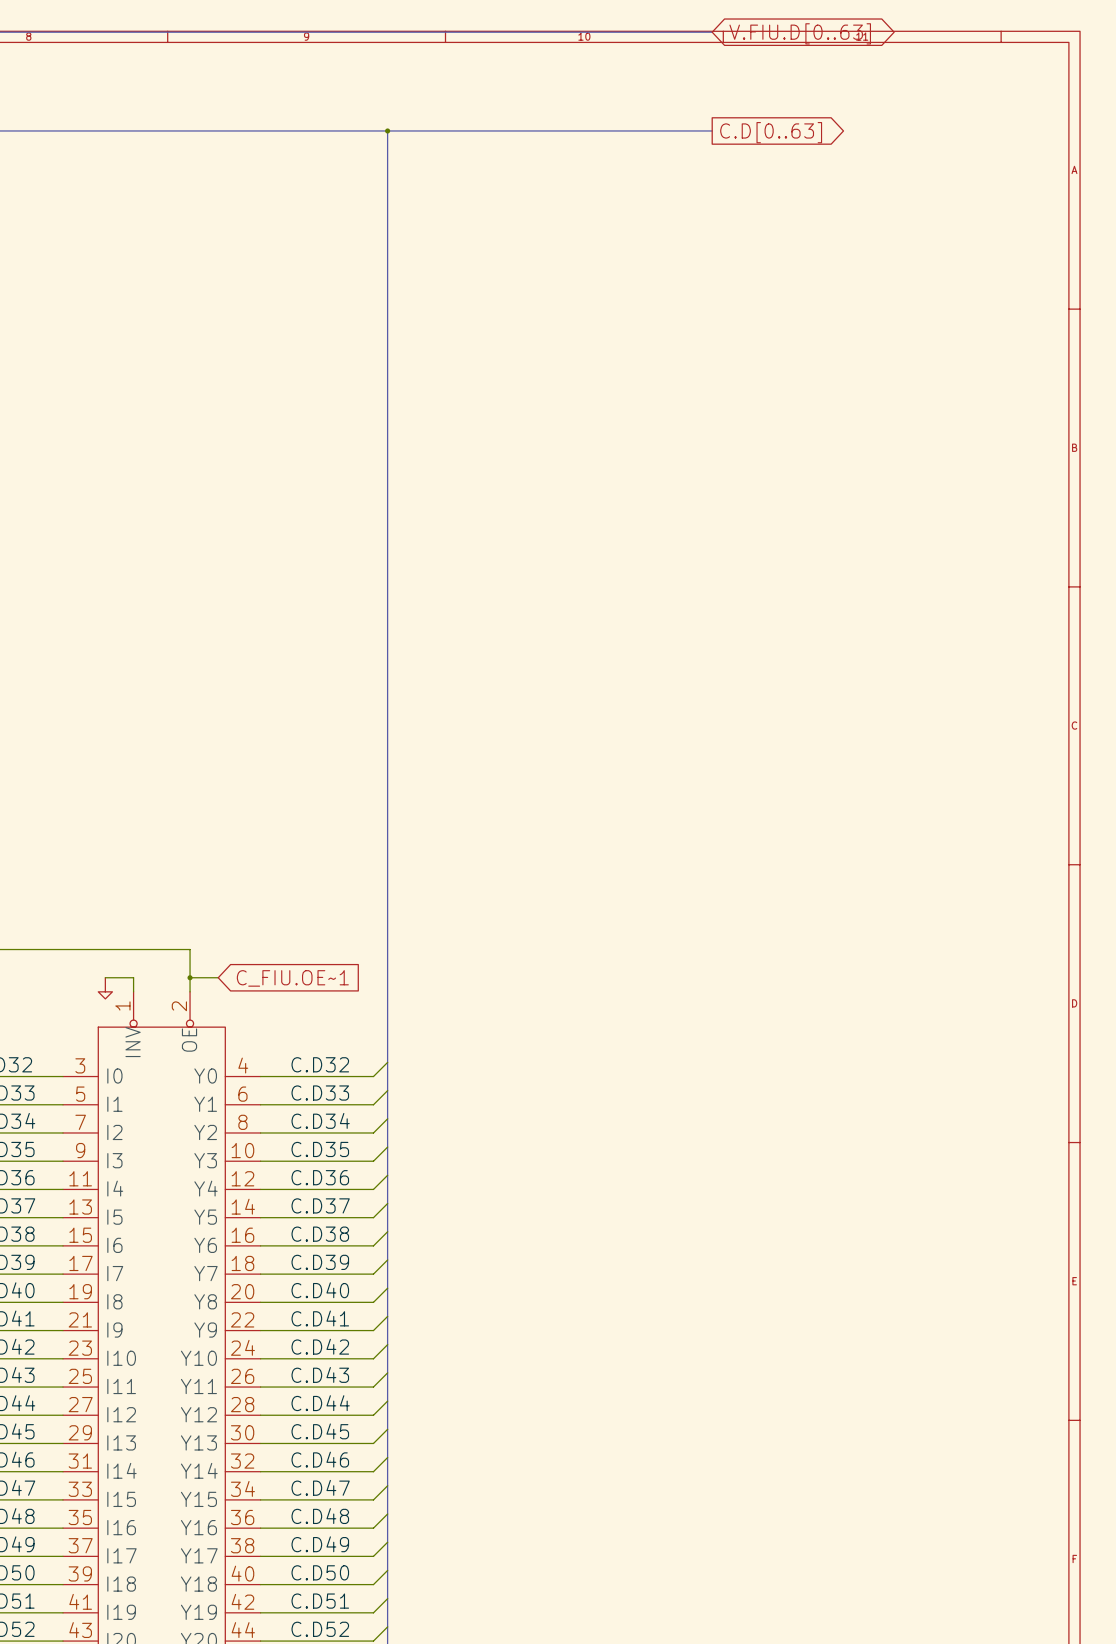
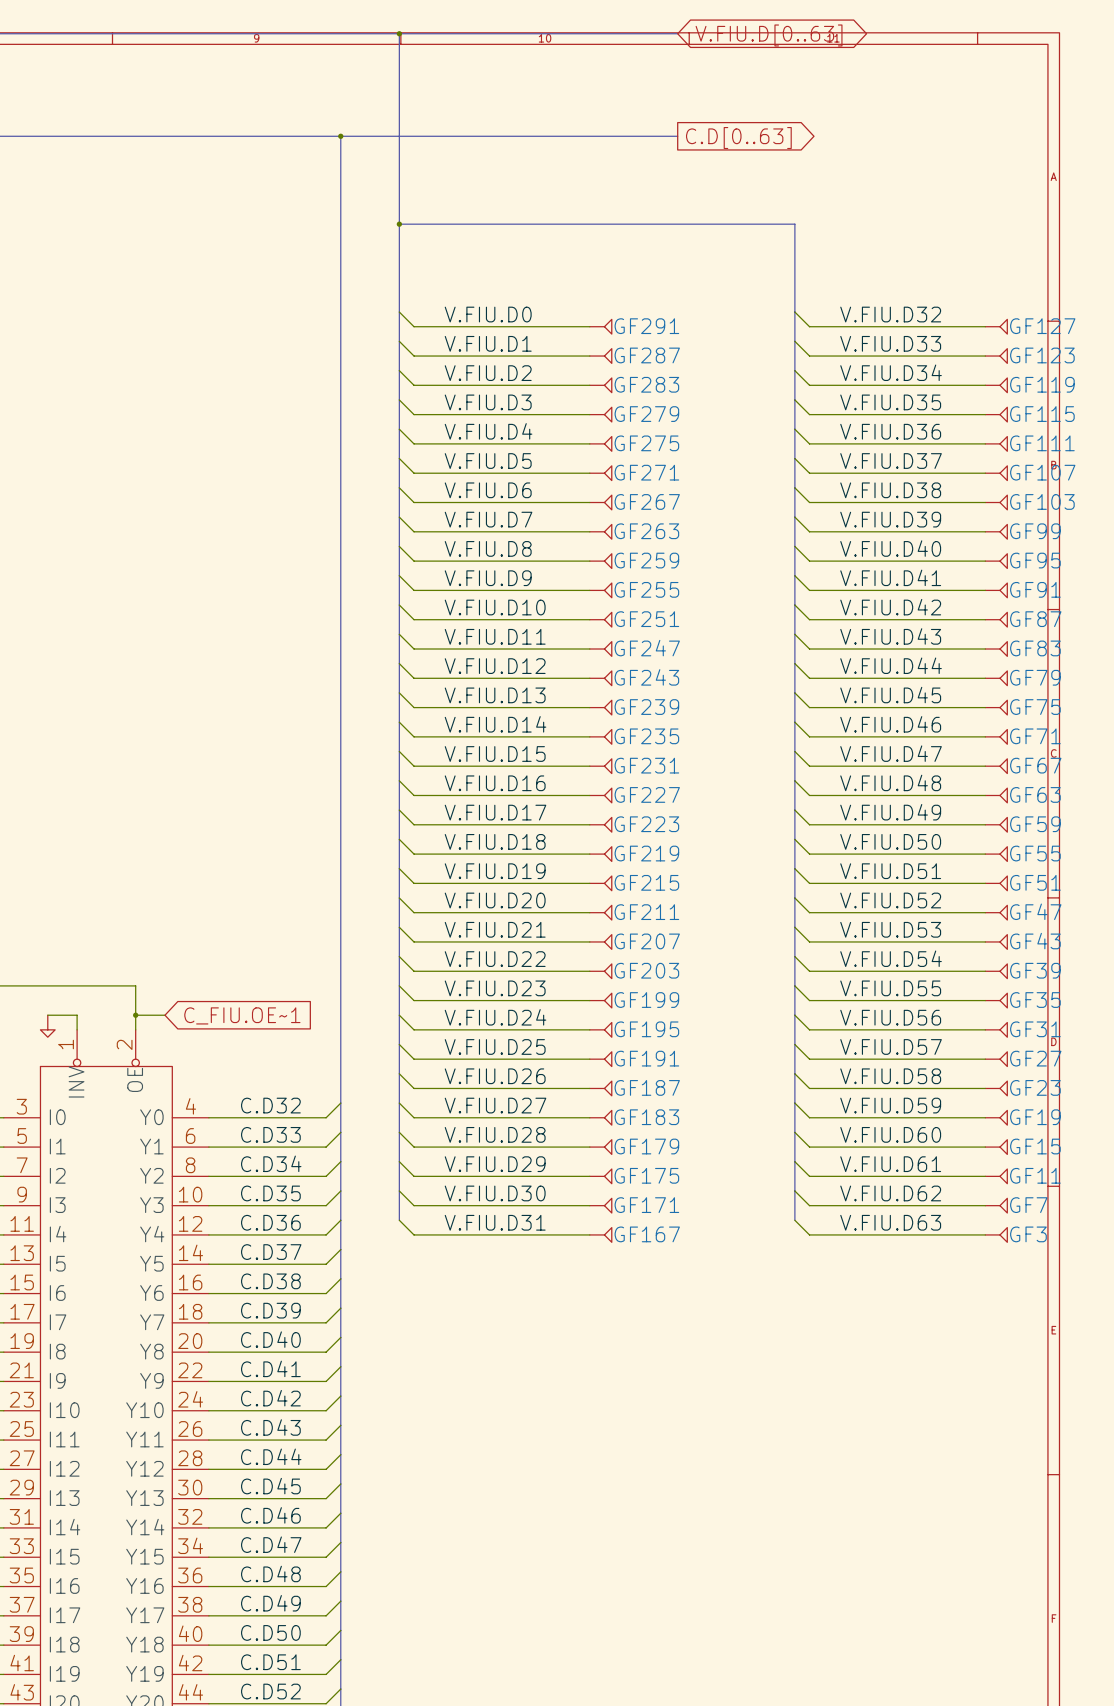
bus: none -> (399, 33) (399, 1220)
junction: none -> (399, 33)
bus: none -> (399, 224) (794, 224) (794, 1220)
junction: none -> (399, 224)
wire: none -> (399, 312) (414, 326) (589, 326)
wire: none -> (794, 312) (809, 326) (985, 326)
label: none -> V.FIU.D0 (488, 314)
label: none -> V.FIU.D32 (890, 314)
GF291: none -> (601, 326)
GF127: none -> (996, 326)
wire: none -> (399, 341) (414, 356) (589, 356)
wire: none -> (794, 341) (809, 356) (985, 356)
label: none -> V.FIU.D1 (488, 343)
label: none -> V.FIU.D33 (890, 343)
GF287: none -> (601, 356)
GF123: none -> (996, 356)
wire: none -> (399, 370) (414, 385) (589, 385)
wire: none -> (794, 370) (809, 385) (985, 385)
label: none -> V.FIU.D34 (891, 372)
label: none -> V.FIU.D2 (488, 373)
GF283: none -> (601, 385)
GF119: none -> (996, 385)
wire: none -> (399, 399) (414, 414) (589, 414)
wire: none -> (794, 399) (809, 414) (985, 414)
label: none -> V.FIU.D3 (488, 402)
label: none -> V.FIU.D35 (890, 402)
GF279: none -> (601, 414)
GF115: none -> (996, 414)
wire: none -> (399, 429) (414, 443) (589, 443)
wire: none -> (794, 429) (809, 443) (985, 443)
label: none -> V.FIU.D4 (488, 431)
label: none -> V.FIU.D36 (890, 431)
GF275: none -> (601, 443)
GF111: none -> (996, 443)
wire: none -> (399, 458) (414, 473) (589, 473)
wire: none -> (794, 458) (809, 473) (985, 473)
label: none -> V.FIU.D5 (488, 461)
label: none -> V.FIU.D37 (891, 461)
GF271: none -> (601, 473)
GF107: none -> (996, 473)
wire: none -> (399, 487) (414, 502) (589, 502)
wire: none -> (794, 487) (809, 502) (985, 502)
label: none -> V.FIU.D6 (488, 490)
label: none -> V.FIU.D38 (890, 490)
GF267: none -> (601, 502)
GF103: none -> (996, 502)
wire: none -> (399, 517) (414, 531) (589, 531)
wire: none -> (794, 517) (809, 531) (985, 531)
label: none -> V.FIU.D7 (488, 519)
label: none -> V.FIU.D39 (890, 519)
GF263: none -> (601, 531)
GF99: none -> (996, 531)
wire: none -> (399, 546) (414, 561) (589, 561)
wire: none -> (794, 546) (809, 561) (985, 561)
label: none -> V.FIU.D8 (488, 548)
label: none -> V.FIU.D40 (890, 548)
GF259: none -> (601, 561)
GF95: none -> (996, 561)
wire: none -> (399, 575) (414, 590) (589, 590)
wire: none -> (794, 575) (809, 590) (985, 590)
label: none -> V.FIU.D9 (488, 578)
label: none -> V.FIU.D41 (890, 577)
GF255: none -> (601, 590)
GF91: none -> (996, 590)
wire: none -> (399, 605) (414, 619) (589, 619)
wire: none -> (794, 605) (809, 619) (985, 619)
label: none -> V.FIU.D10 (495, 607)
label: none -> V.FIU.D42 (890, 607)
GF251: none -> (601, 619)
GF87: none -> (996, 619)
wire: none -> (399, 634) (414, 649) (589, 649)
wire: none -> (794, 634) (809, 649) (985, 649)
label: none -> V.FIU.D43 (890, 636)
label: none -> V.FIU.D11 (495, 636)
GF247: none -> (601, 649)
GF83: none -> (996, 649)
wire: none -> (399, 663) (414, 678) (589, 678)
wire: none -> (794, 663) (809, 678) (985, 678)
label: none -> V.FIU.D12 (495, 666)
label: none -> V.FIU.D44 (891, 665)
GF243: none -> (601, 678)
GF79: none -> (996, 678)
wire: none -> (399, 692) (414, 707) (589, 707)
wire: none -> (794, 692) (809, 707) (985, 707)
label: none -> V.FIU.D13 (495, 695)
label: none -> V.FIU.D45 (890, 695)
GF239: none -> (601, 707)
GF75: none -> (996, 707)
wire: none -> (399, 722) (414, 736) (589, 736)
wire: none -> (794, 722) (809, 736) (985, 736)
label: none -> V.FIU.D14 (495, 724)
label: none -> V.FIU.D46 (890, 724)
GF235: none -> (601, 736)
GF71: none -> (996, 736)
wire: none -> (399, 751) (414, 766) (589, 766)
wire: none -> (794, 751) (809, 766) (985, 766)
label: none -> V.FIU.D47 (891, 753)
label: none -> V.FIU.D15 (495, 754)
GF231: none -> (601, 766)
GF67: none -> (996, 766)
wire: none -> (399, 780) (414, 795) (589, 795)
wire: none -> (794, 780) (809, 795) (985, 795)
label: none -> V.FIU.D48 (890, 782)
label: none -> V.FIU.D16 (495, 783)
GF227: none -> (601, 795)
GF63: none -> (996, 795)
wire: none -> (399, 810) (414, 824) (589, 824)
wire: none -> (794, 810) (809, 824) (985, 824)
label: none -> V.FIU.D17 (495, 812)
label: none -> V.FIU.D49 (890, 812)
GF223: none -> (601, 824)
GF59: none -> (996, 824)
wire: none -> (399, 839) (414, 854) (589, 854)
wire: none -> (794, 839) (809, 854) (985, 854)
label: none -> V.FIU.D18 (495, 841)
label: none -> V.FIU.D50 (890, 841)
GF219: none -> (601, 854)
GF55: none -> (996, 854)
wire: none -> (399, 868) (414, 883) (589, 883)
wire: none -> (794, 868) (809, 883) (985, 883)
label: none -> V.FIU.D19 (495, 871)
label: none -> V.FIU.D51 (890, 871)
GF215: none -> (601, 883)
GF51: none -> (996, 883)
wire: none -> (399, 898) (414, 912) (589, 912)
wire: none -> (794, 898) (809, 912) (985, 912)
label: none -> V.FIU.D20 (495, 900)
label: none -> V.FIU.D52 (890, 900)
GF211: none -> (601, 912)
GF47: none -> (996, 912)
wire: none -> (399, 927) (414, 941) (589, 941)
wire: none -> (794, 927) (809, 941) (985, 941)
label: none -> V.FIU.D21 (495, 929)
label: none -> V.FIU.D53 (890, 929)
GF207: none -> (601, 941)
GF43: none -> (996, 941)
wire: none -> (399, 956) (414, 971) (589, 971)
wire: none -> (794, 956) (809, 971) (985, 971)
label: none -> V.FIU.D22 (495, 959)
label: none -> V.FIU.D54 (891, 958)
GF203: none -> (601, 971)
GF39: none -> (996, 971)
wire: none -> (399, 985) (414, 1000) (589, 1000)
wire: none -> (794, 985) (809, 1000) (985, 1000)
label: none -> V.FIU.D23 (495, 988)
label: none -> V.FIU.D55 (890, 988)
GF199: none -> (601, 1000)
GF35: none -> (996, 1000)
wire: none -> (399, 1015) (414, 1029) (589, 1029)
wire: none -> (794, 1015) (809, 1029) (985, 1029)
label: none -> V.FIU.D24 (495, 1017)
label: none -> V.FIU.D56 (890, 1017)
GF195: none -> (601, 1029)
GF31: none -> (996, 1029)
wire: none -> (399, 1044) (414, 1059) (589, 1059)
wire: none -> (794, 1044) (809, 1059) (985, 1059)
label: none -> V.FIU.D25 (495, 1046)
label: none -> V.FIU.D57 (891, 1046)
GF191: none -> (601, 1059)
GF27: none -> (996, 1059)
wire: none -> (399, 1073) (414, 1088) (589, 1088)
wire: none -> (794, 1073) (809, 1088) (985, 1088)
label: none -> V.FIU.D26 (495, 1076)
label: none -> V.FIU.D58 (890, 1076)
GF187: none -> (601, 1088)
GF23: none -> (996, 1088)
wire: none -> (399, 1103) (414, 1117) (589, 1117)
wire: none -> (794, 1103) (809, 1117) (985, 1117)
label: none -> V.FIU.D27 (495, 1105)
label: none -> V.FIU.D59 (890, 1105)
GF183: none -> (601, 1117)
GF19: none -> (996, 1117)
wire: none -> (399, 1132) (414, 1147) (589, 1147)
wire: none -> (794, 1132) (809, 1147) (985, 1147)
label: none -> V.FIU.D28 (495, 1134)
label: none -> V.FIU.D60 (890, 1134)
GF179: none -> (601, 1147)
GF15: none -> (996, 1147)
wire: none -> (399, 1161) (414, 1176) (589, 1176)
wire: none -> (794, 1161) (809, 1176) (985, 1176)
label: none -> V.FIU.D29 (495, 1164)
label: none -> V.FIU.D61 (890, 1164)
GF175: none -> (601, 1176)
GF11: none -> (996, 1176)
wire: none -> (399, 1191) (414, 1205) (589, 1205)
wire: none -> (794, 1191) (809, 1205) (985, 1205)
label: none -> V.FIU.D30 (495, 1193)
label: none -> V.FIU.D62 (890, 1193)
GF171: none -> (601, 1205)
GF7: none -> (996, 1205)
wire: none -> (399, 1220) (414, 1234) (589, 1234)
wire: none -> (794, 1220) (809, 1234) (985, 1234)
label: none -> V.FIU.D31 (495, 1222)
label: none -> V.FIU.D63 (890, 1222)
GF167: none -> (601, 1234)
GF3: none -> (996, 1234)

